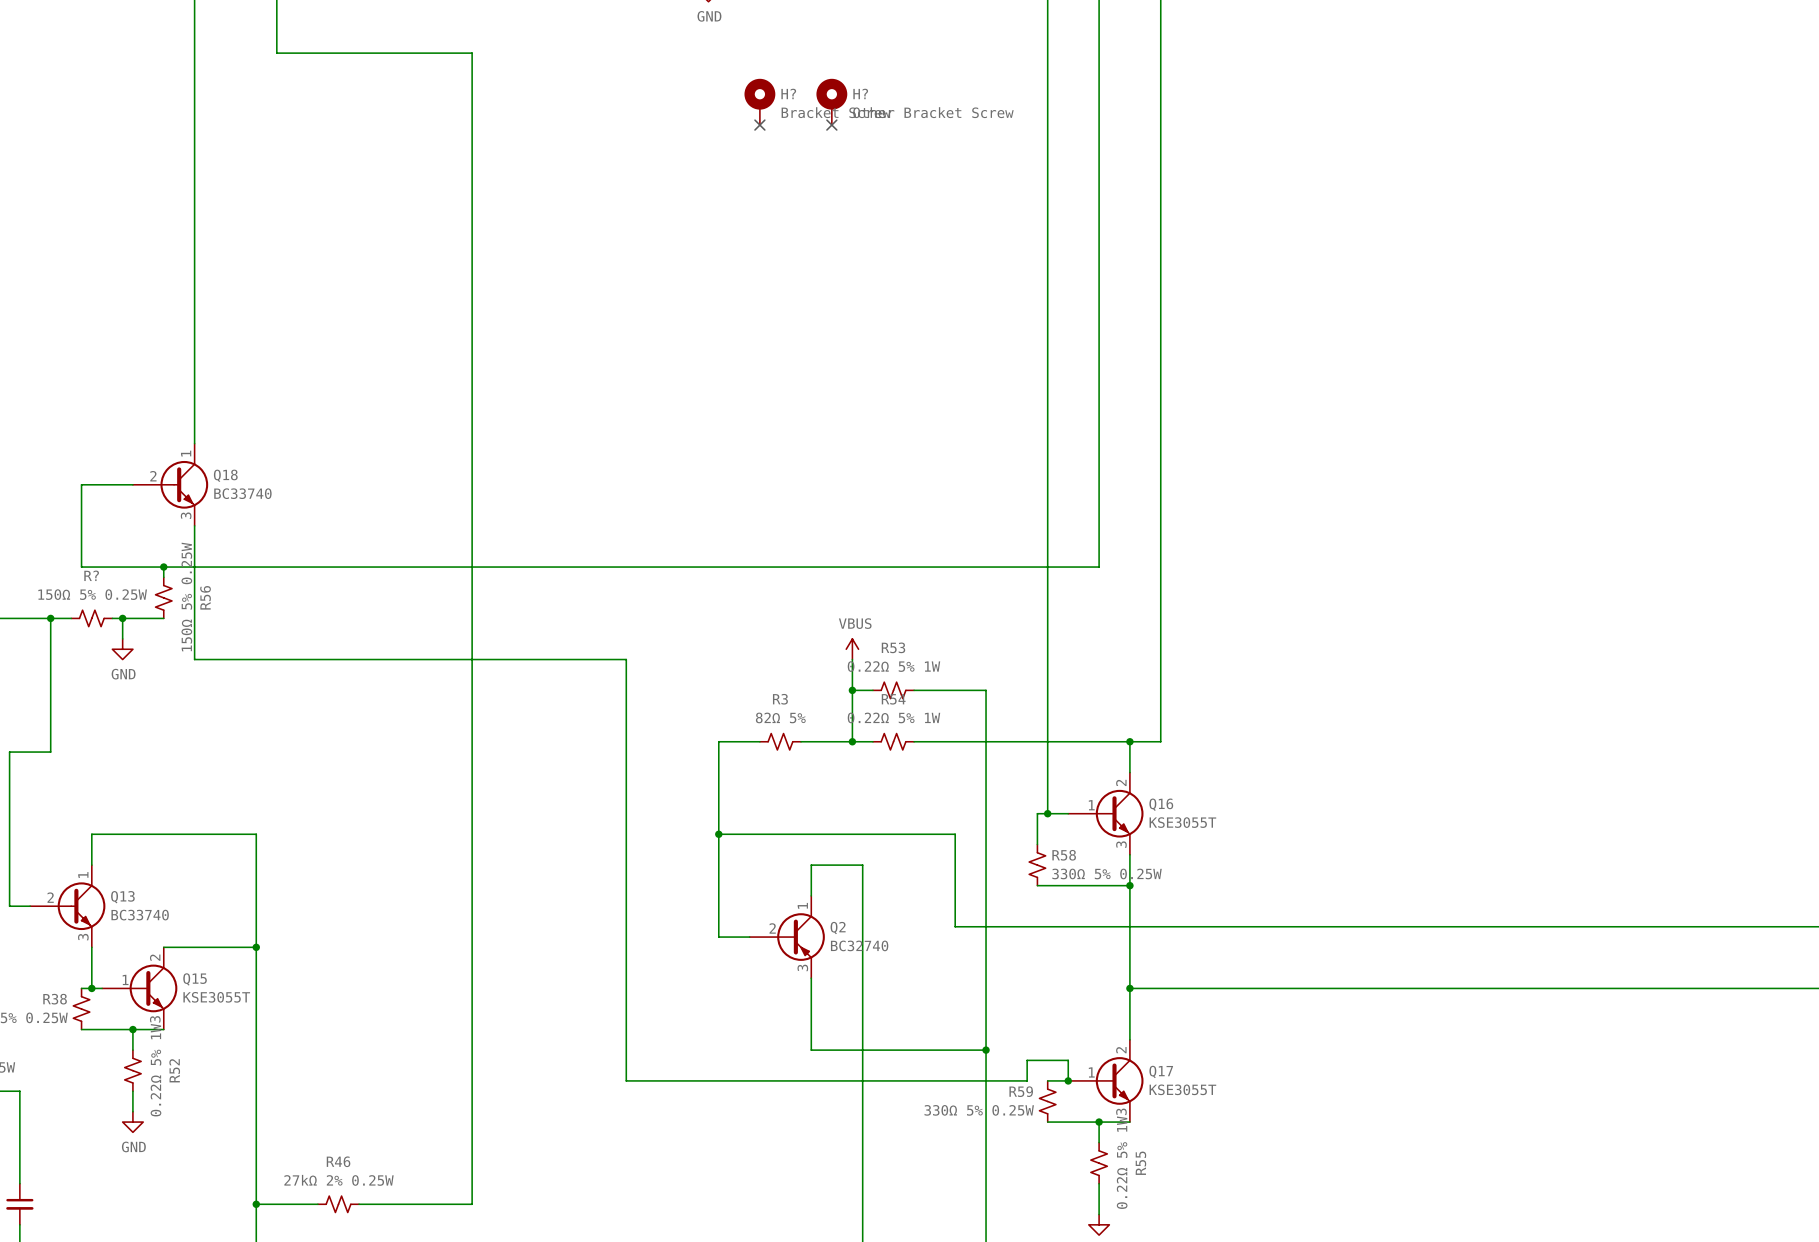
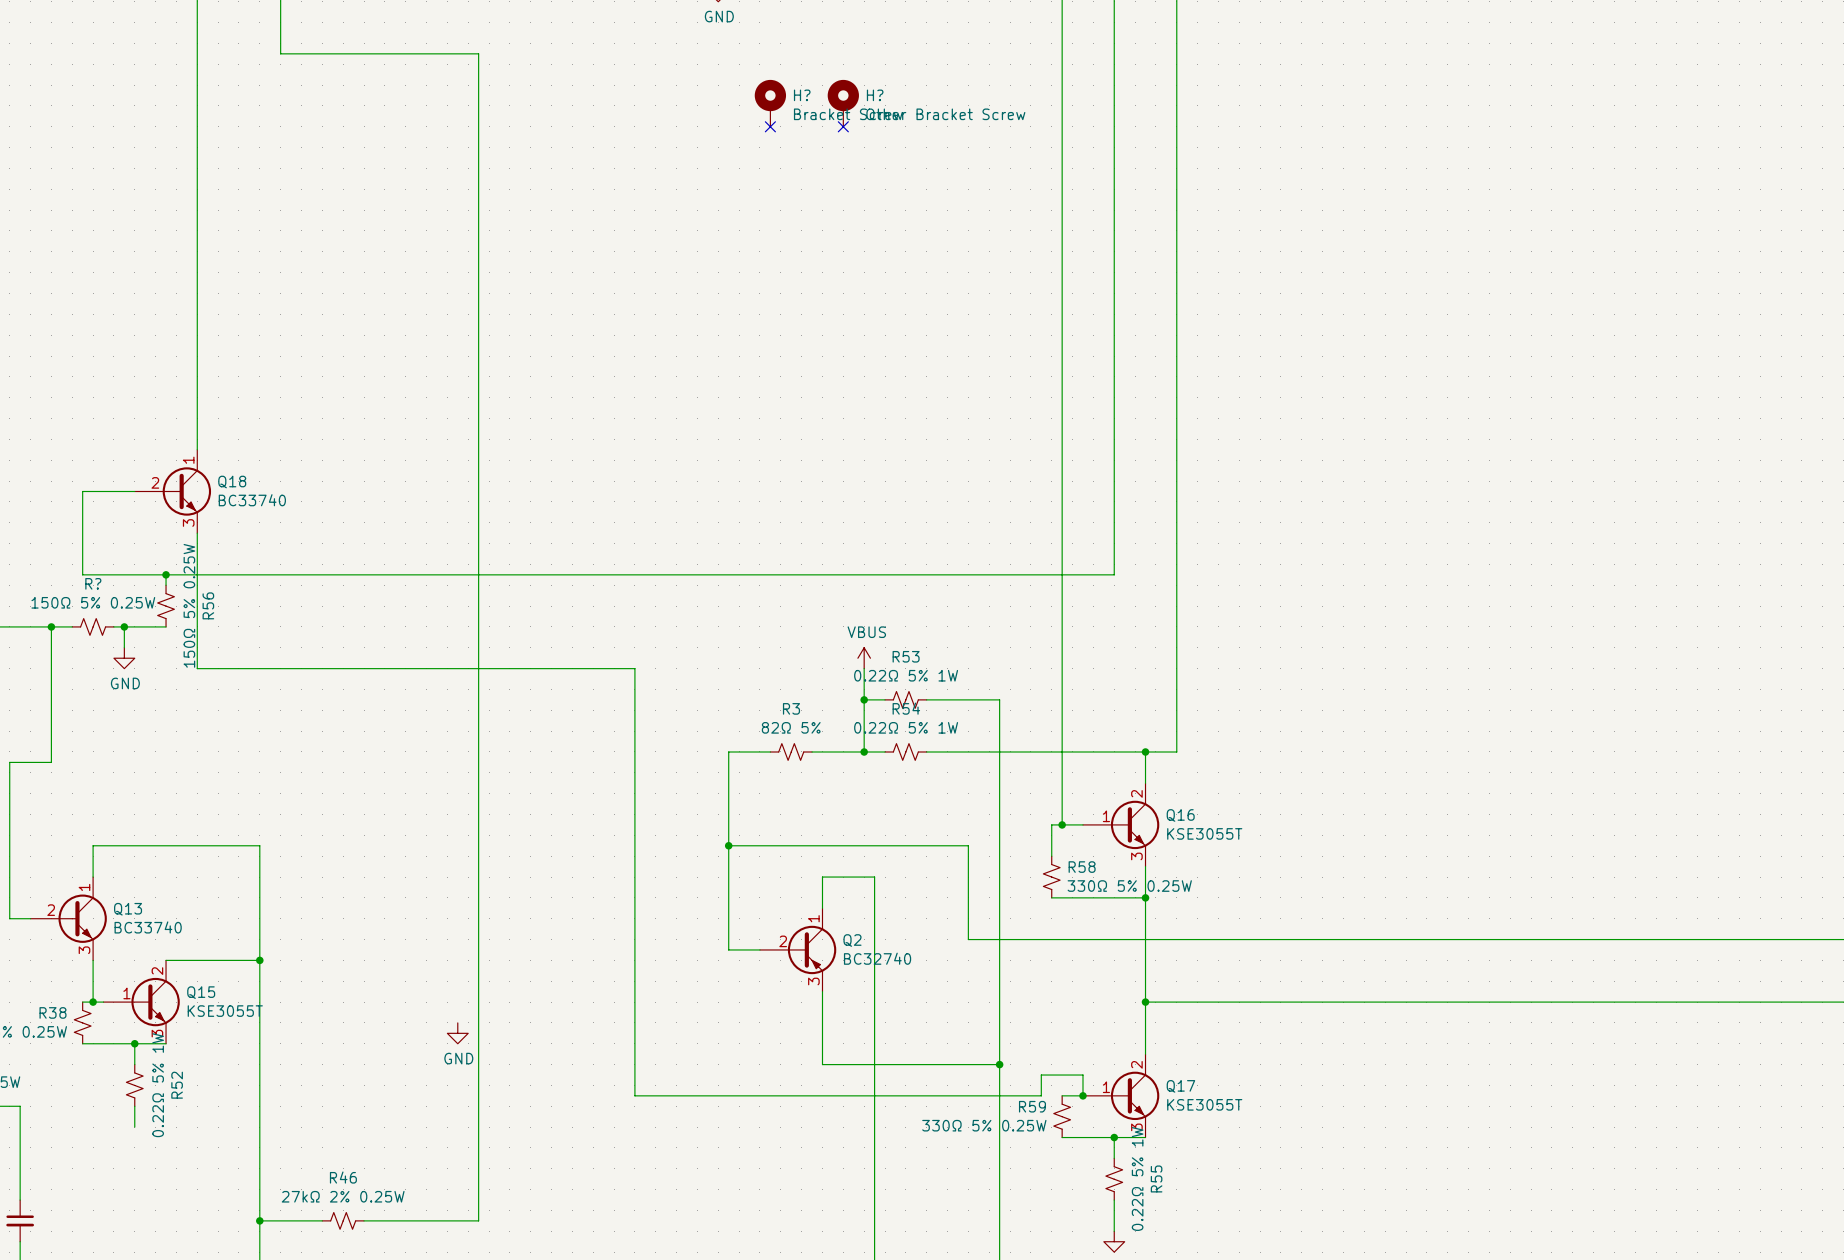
power symbol: none -> GND (457, 1033)
power symbol: GND (132, 1122) -> none

